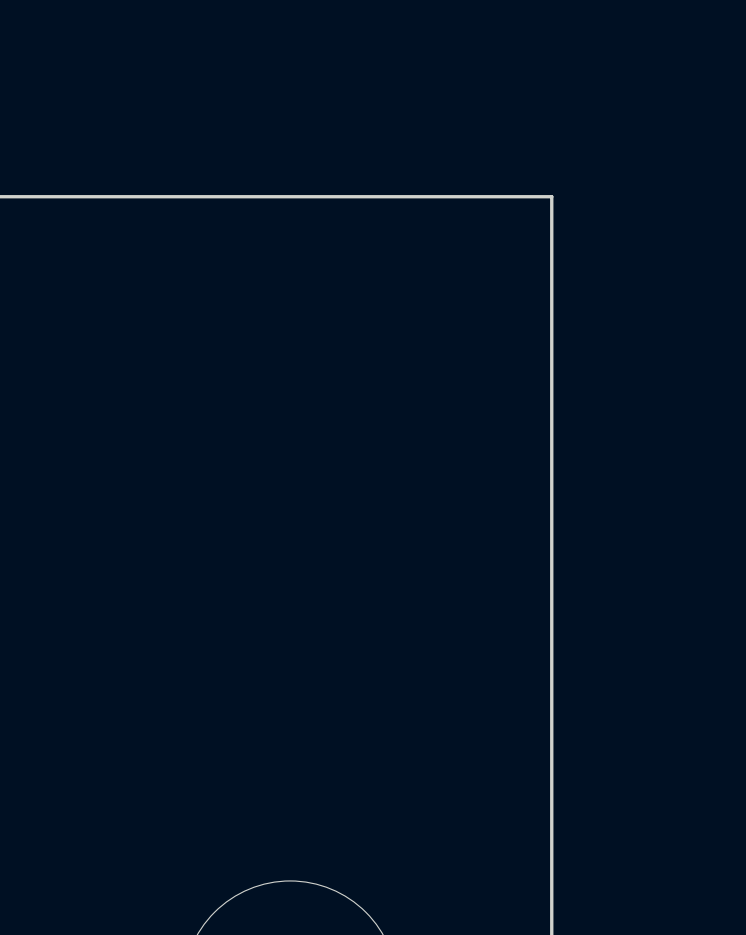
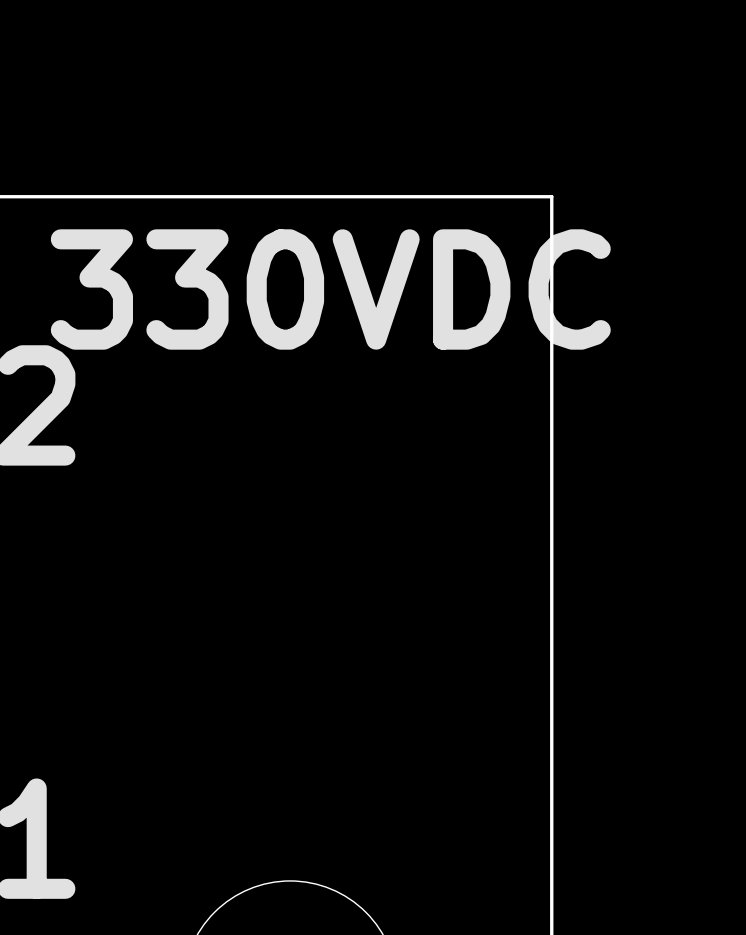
text: none -> 330VDC (330, 289)

